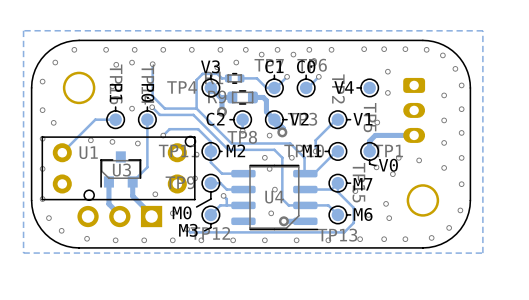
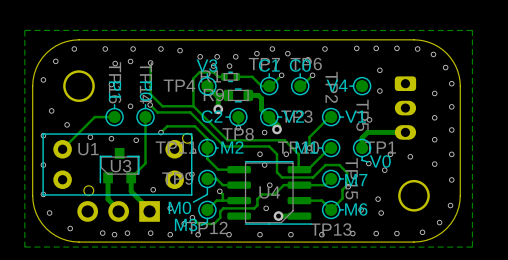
via: (191, 49) -> none
via: (220, 49) -> none
via: (245, 49) -> none
via: (309, 49) -> none
via: none -> (180, 50)
via: none -> (200, 56)
via: none -> (217, 56)
via: none -> (235, 56)
via: (236, 62) -> none
via: none -> (229, 66)
via: (42, 110) -> none
via: none -> (51, 110)
via: (53, 122) -> none
via: none -> (67, 124)
track: (282, 176) (282, 199) (288, 205) (305, 205) -> (277, 172) (282, 177) (313, 177) (325, 165) (339, 165) (347, 172) (347, 185) (342, 189) (342, 198) (331, 209)
track: (337, 183) (337, 192) (353, 207) (353, 222) (344, 232) (190, 232) (187, 229) -> none
track: none -> (299, 185) (283, 185) (274, 194) (262, 194) (257, 199) (257, 205) (254, 208) (223, 208) (220, 211) (220, 217) (214, 223) (198, 223) (192, 217)
via: none -> (192, 217)
via: (61, 230) -> none
via: none -> (70, 228)
via: (87, 238) -> none
via: none -> (102, 233)
via: none -> (127, 233)
via: none -> (150, 233)
via: (144, 240) -> none

